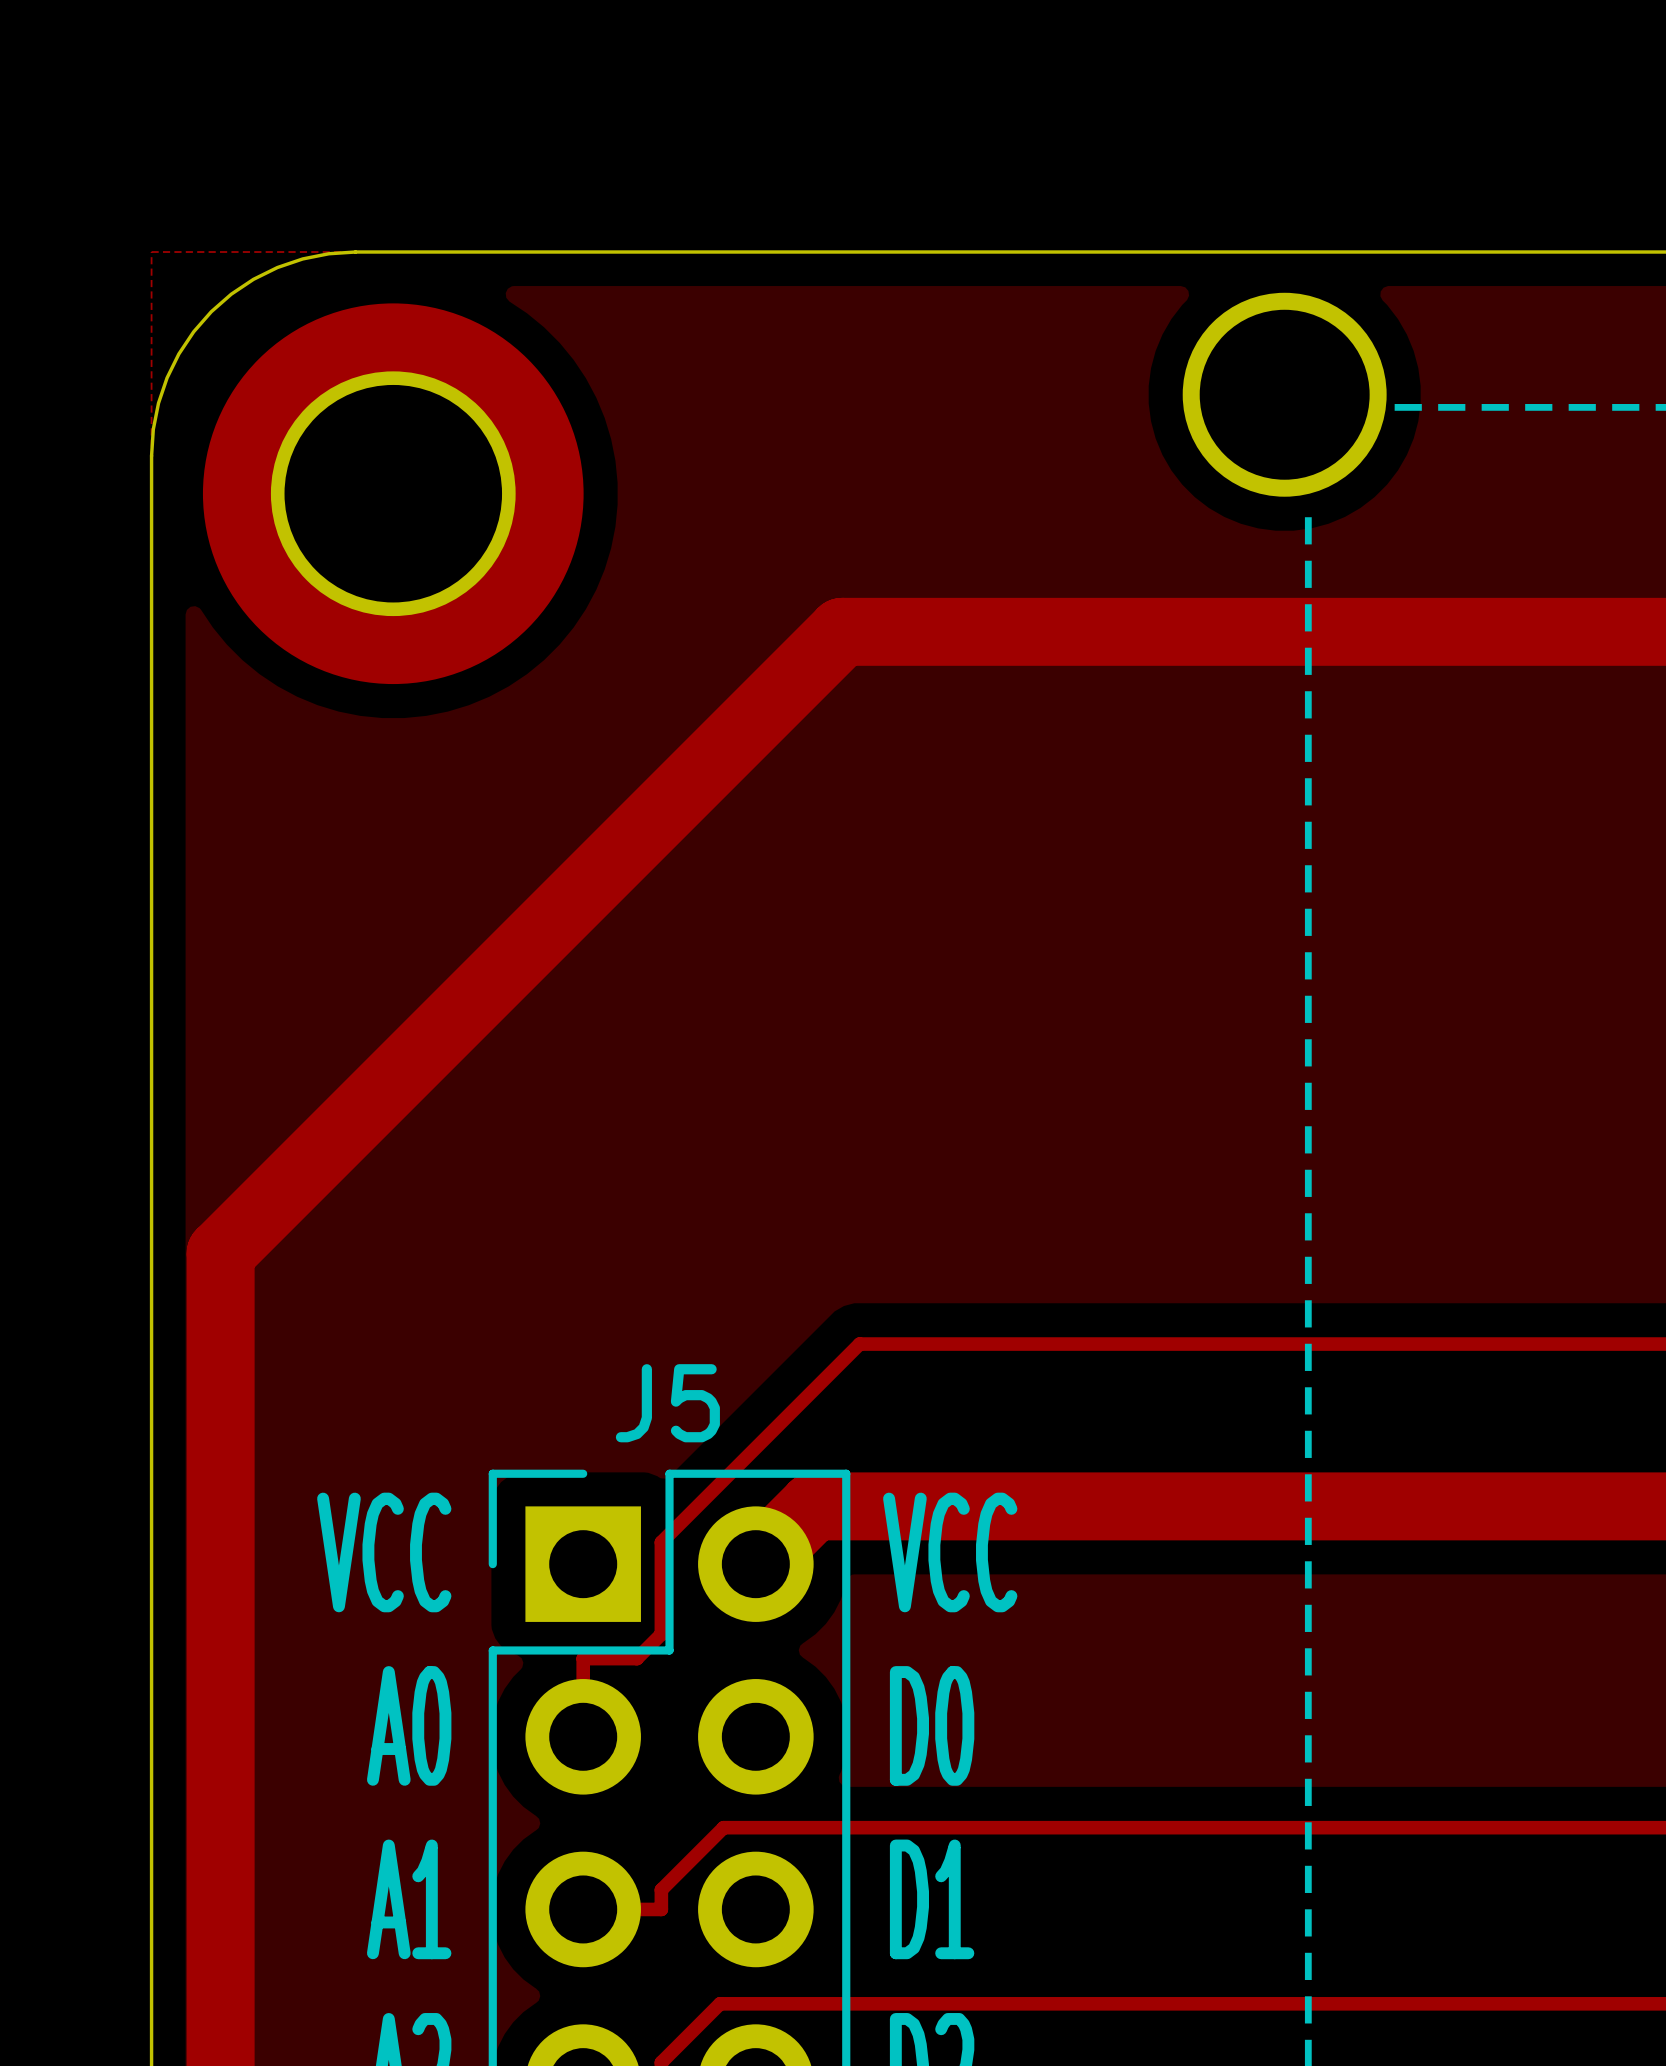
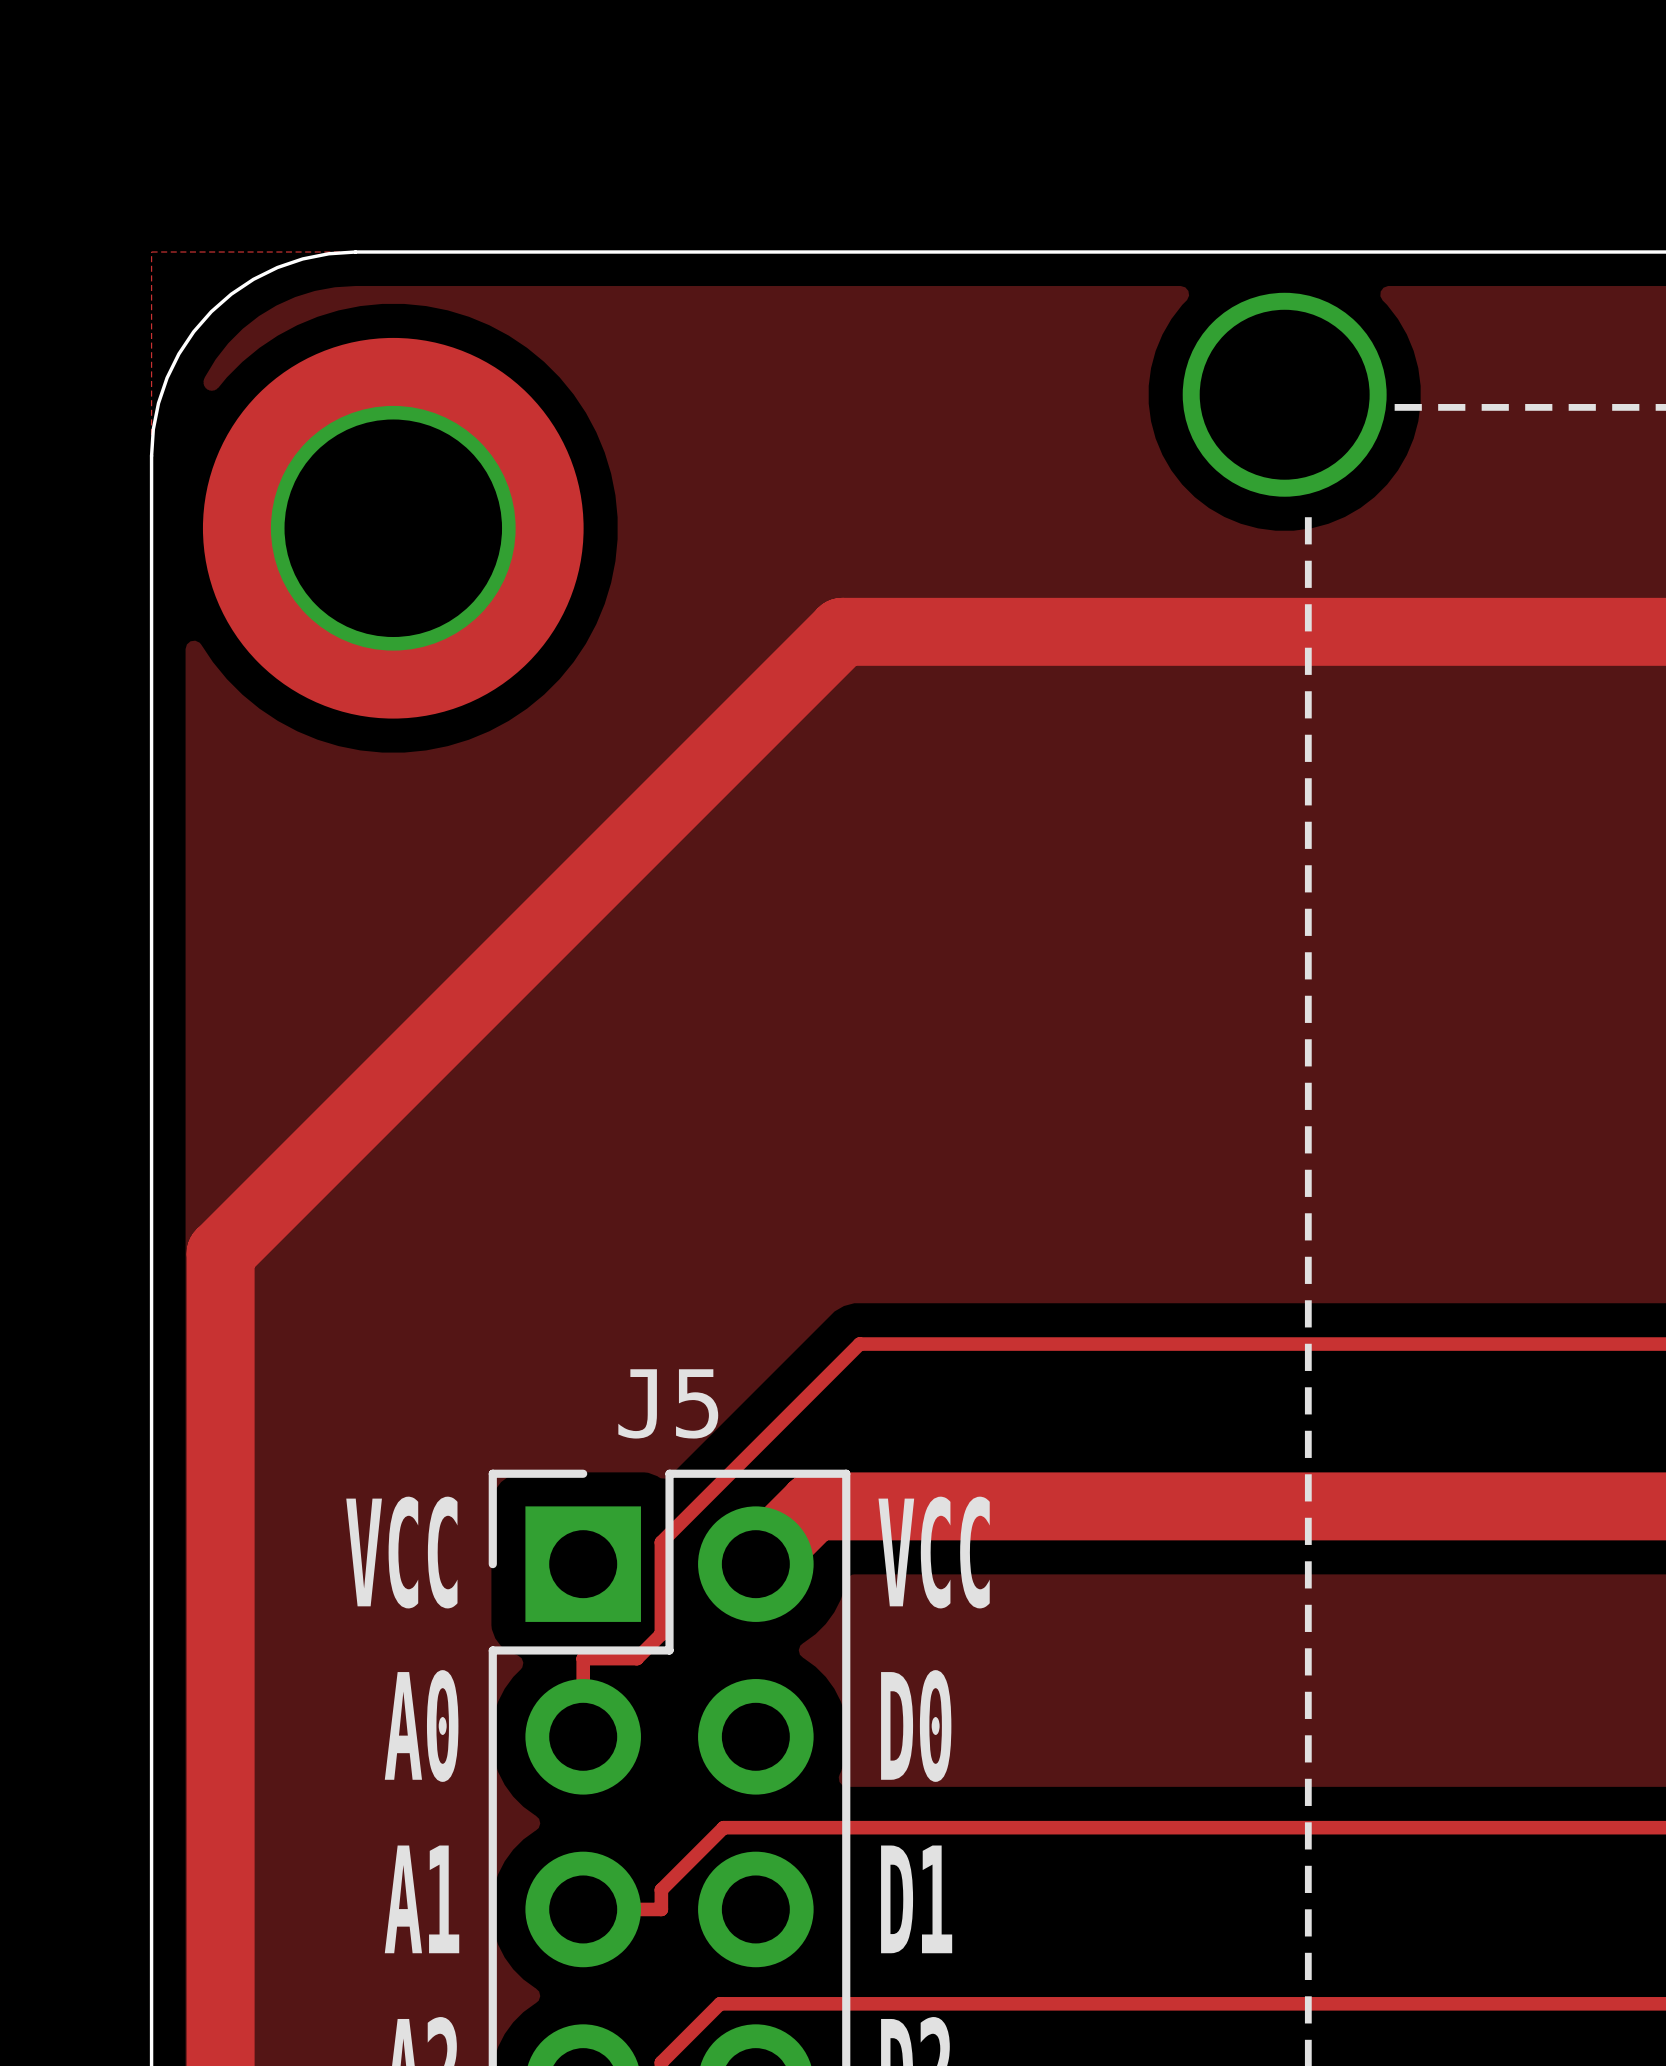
part position: (393, 493) -> (393, 528)

